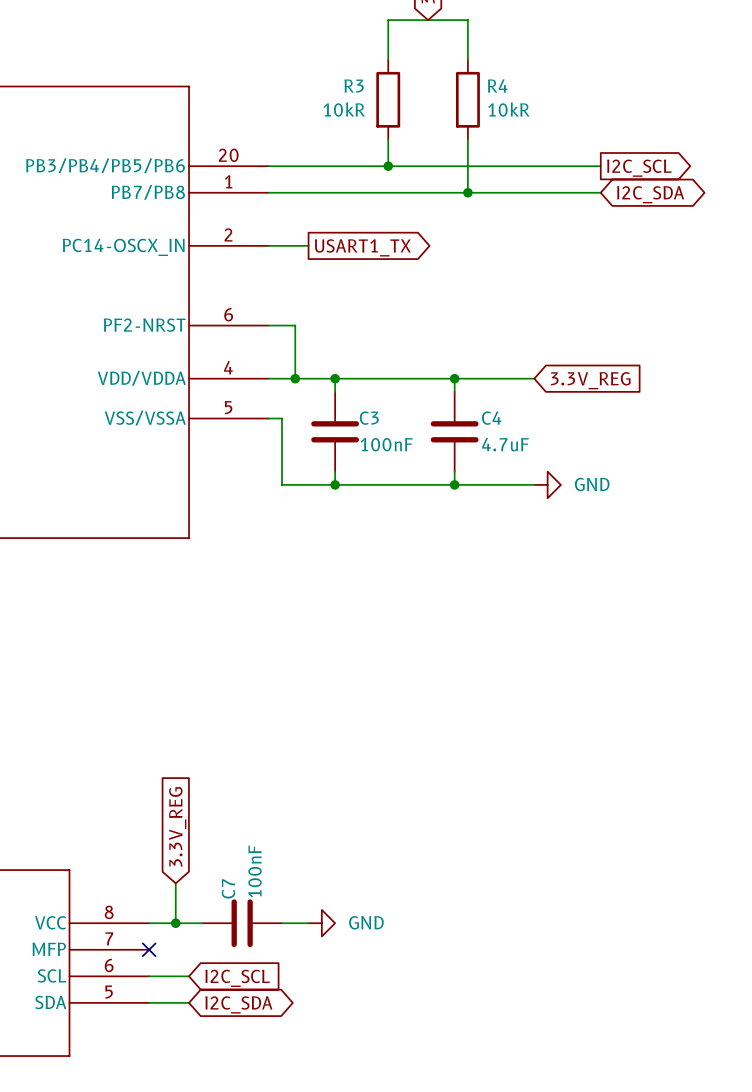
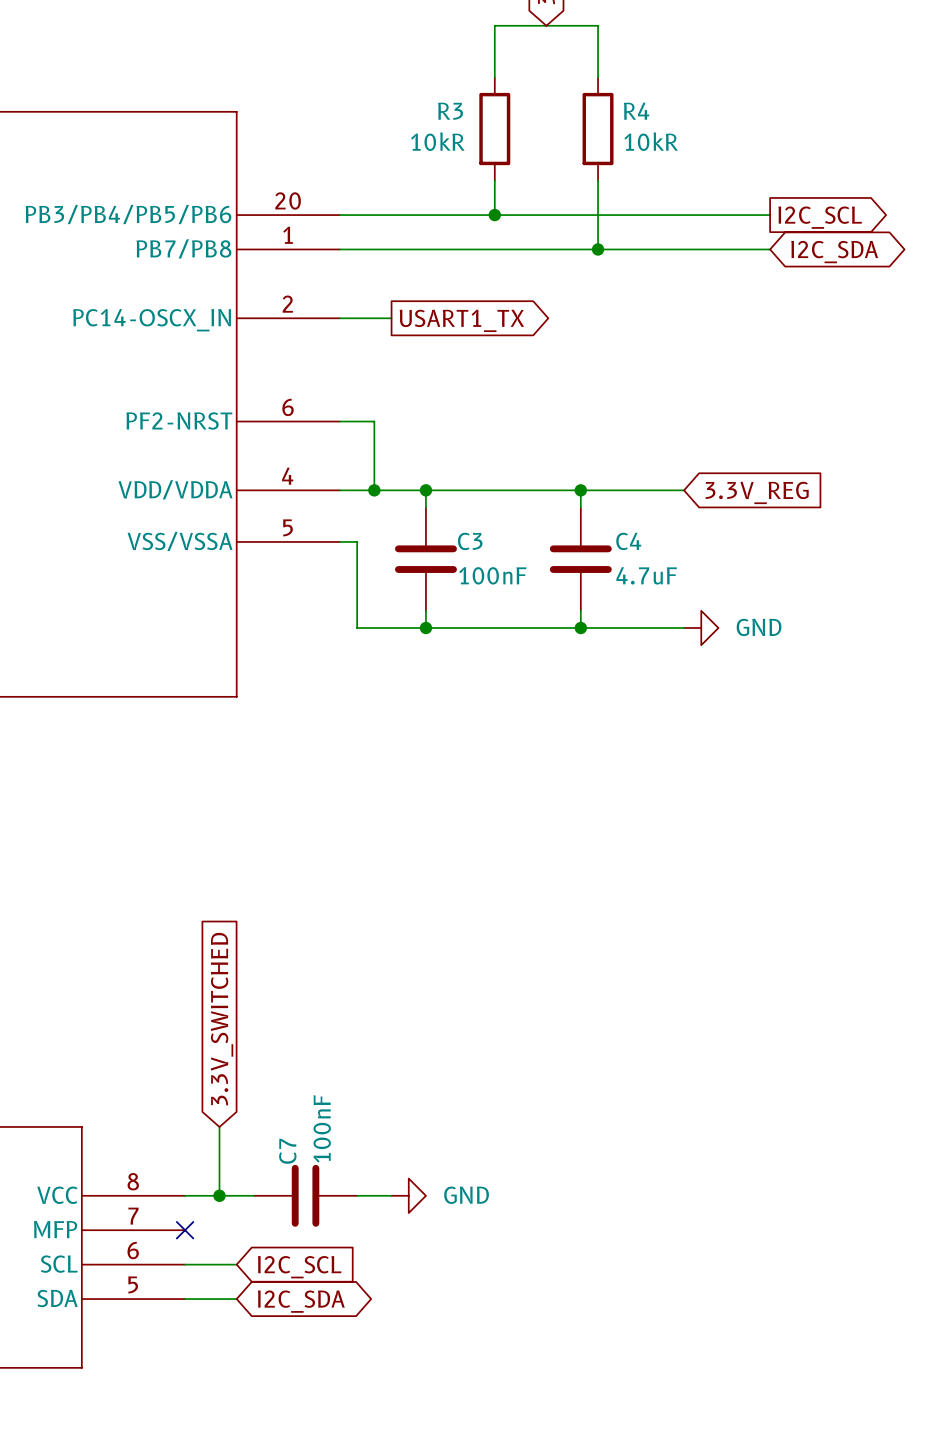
global label: none -> 3.3V_SWITCHED (222, 1019)
global label: 3.3V_REG (177, 826) -> none
wire: none -> (219, 1126) (219, 1144)

